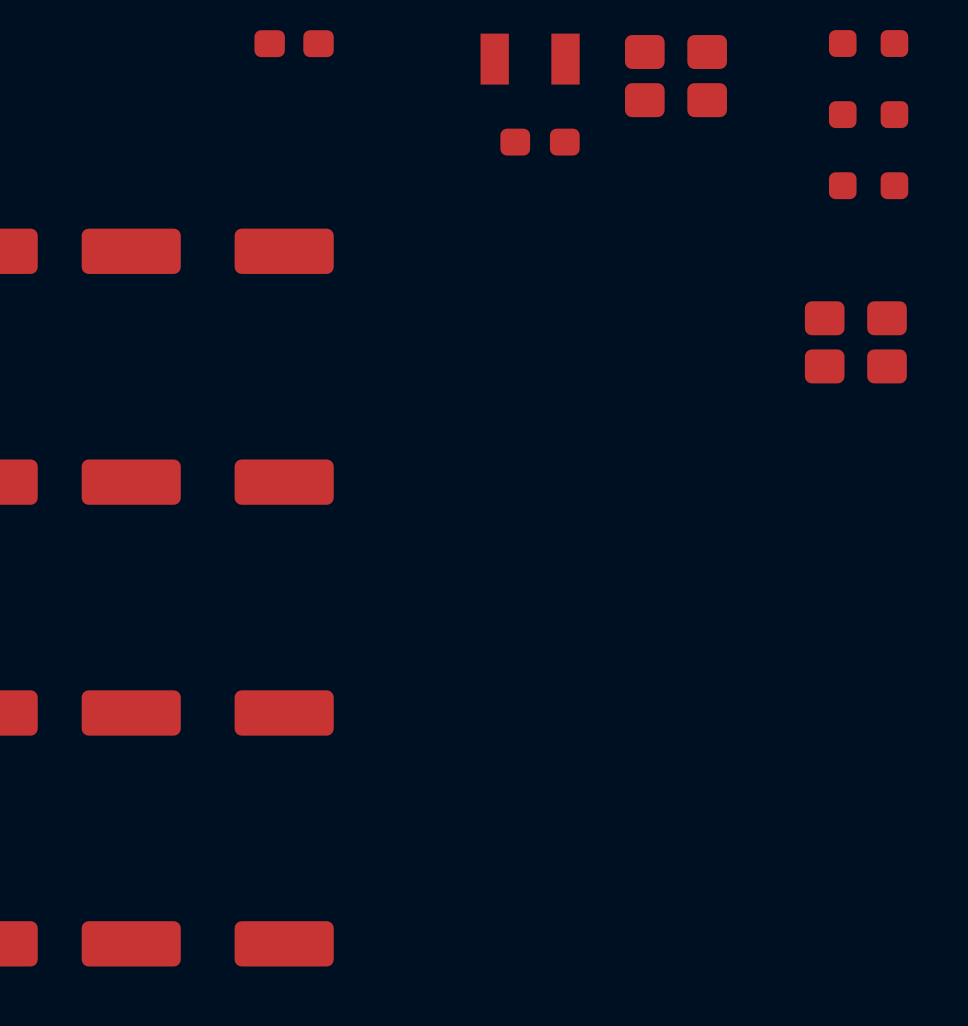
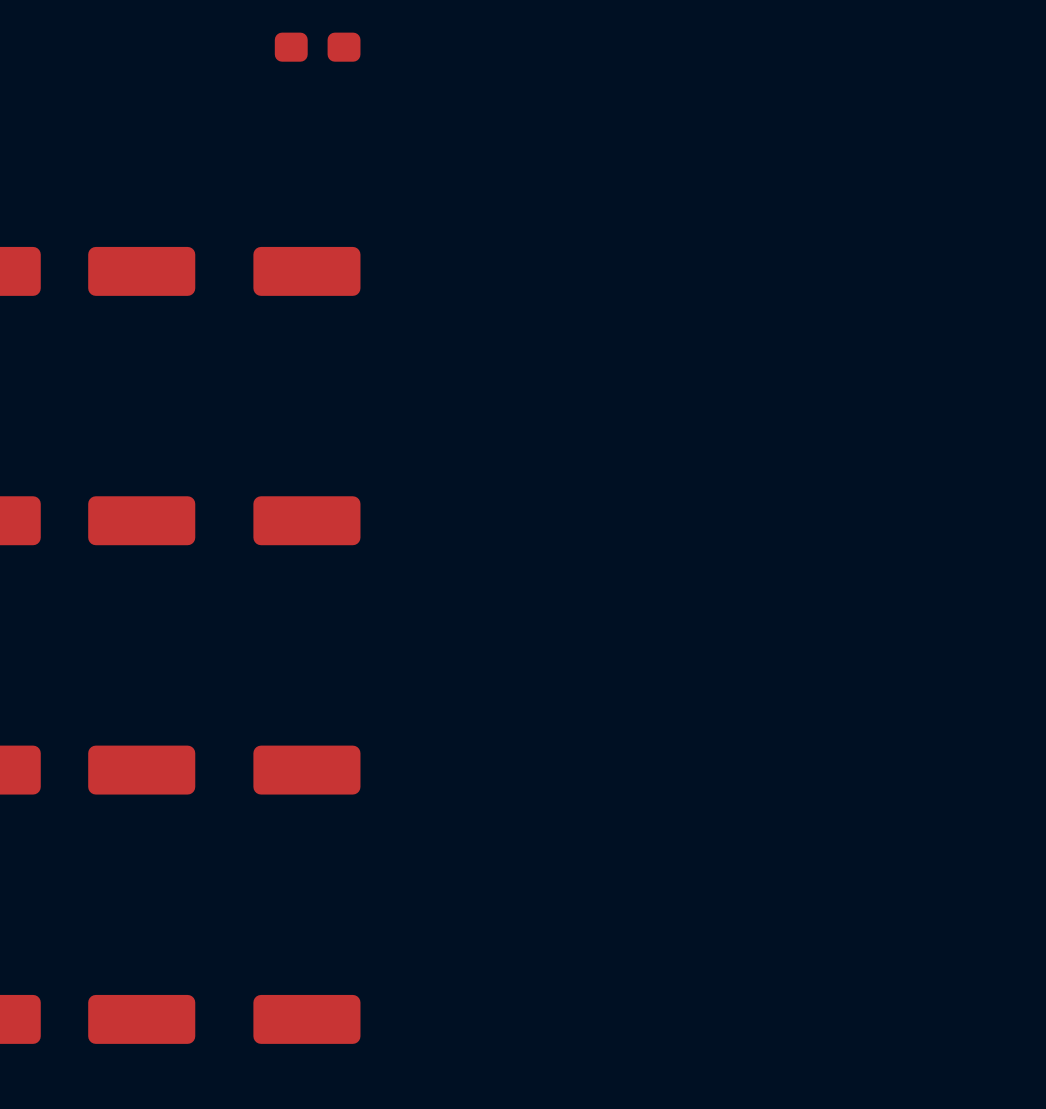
part: (868, 43) -> none
part: (530, 59) -> none
part: (675, 76) -> none
part: (868, 114) -> none
part: (540, 142) -> none
part: (868, 185) -> none
part: (855, 342) -> none

